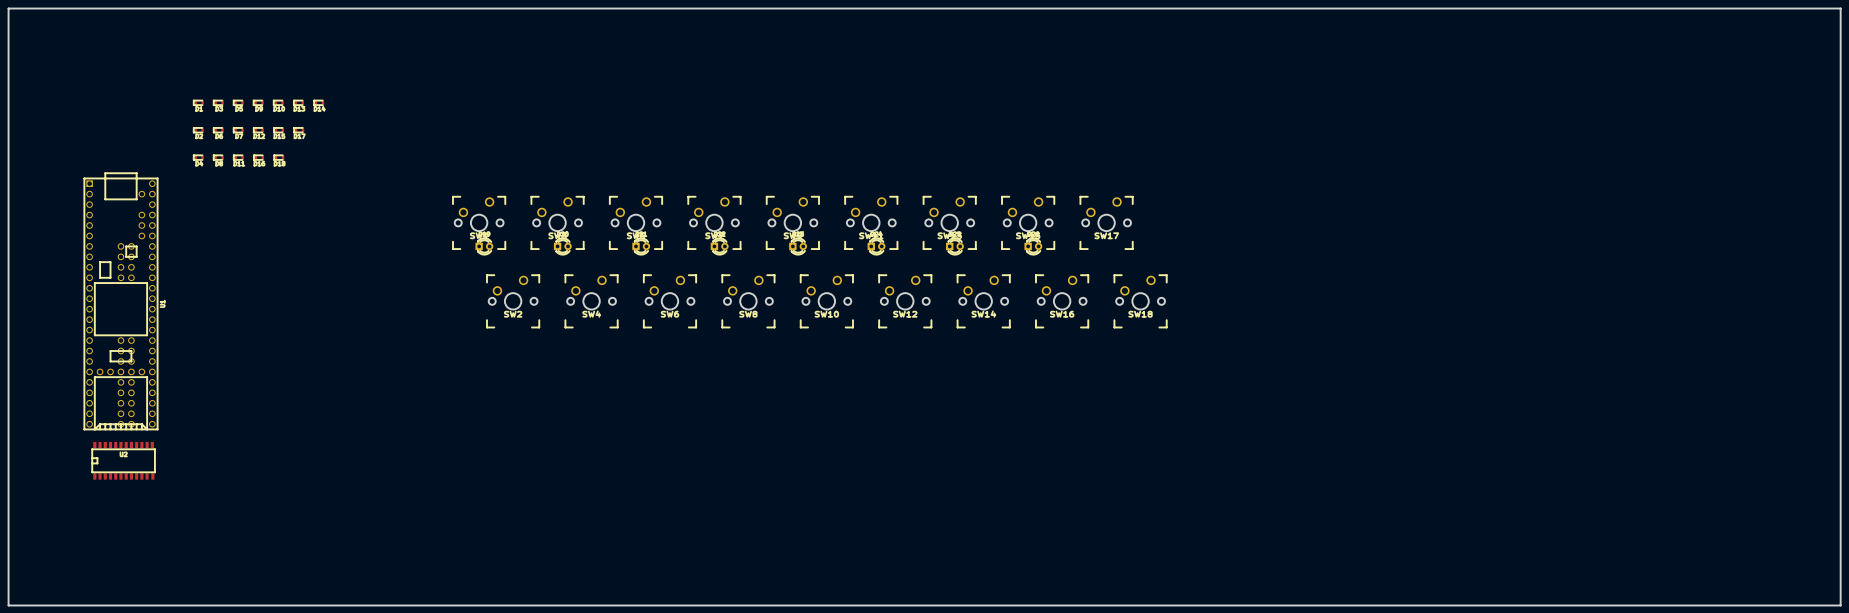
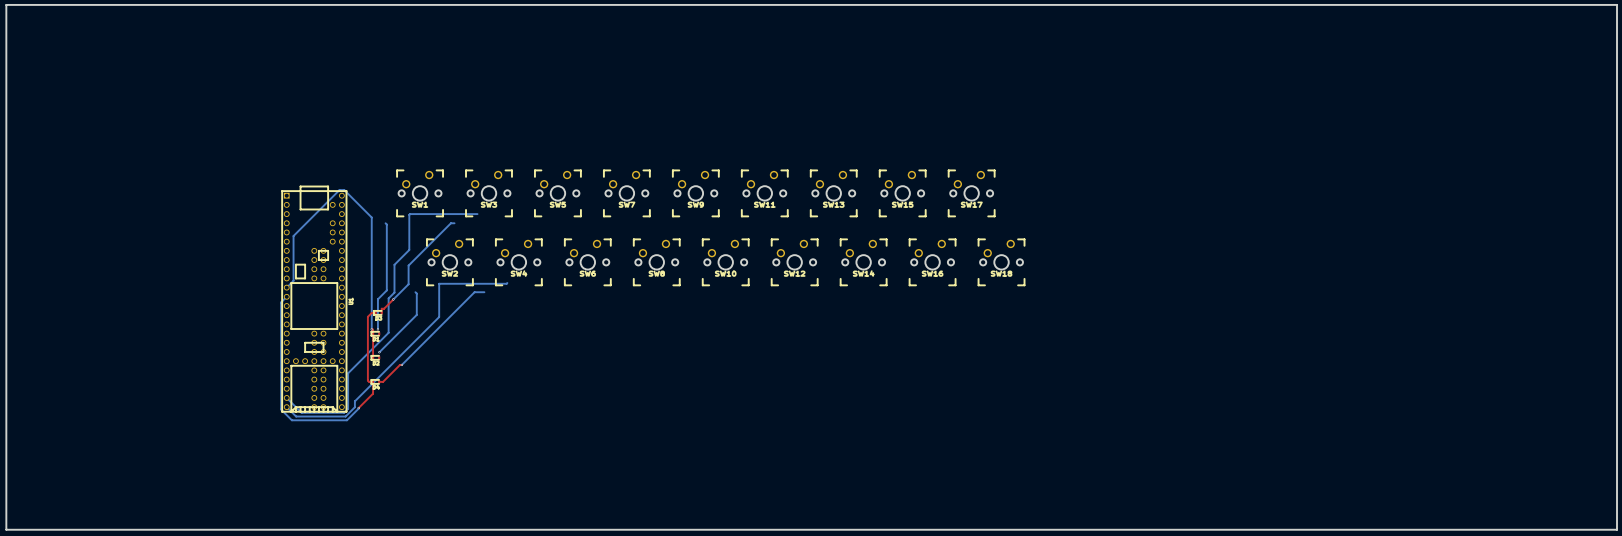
part position: (198, 102) -> (375, 333)
part position: (218, 102) -> (378, 312)
part: (238, 102) -> none
part: (258, 102) -> none
part: (278, 102) -> none
part: (298, 102) -> none
part: (319, 102) -> none
part position: (198, 130) -> (375, 357)
part: (218, 130) -> none
part: (238, 130) -> none
part: (258, 130) -> none
part: (278, 130) -> none
part: (299, 130) -> none
part position: (198, 157) -> (375, 381)
part: (218, 157) -> none
part: (238, 157) -> none
part: (258, 157) -> none
part: (279, 157) -> none
part: (484, 246) -> none
bottom track: none -> (477, 214) (409, 214) (409, 249) (394, 264) (394, 292) (388, 298) (388, 332) (348, 373) (348, 408) (344, 412) (301, 412) (286, 397)
part: (562, 246) -> none
part: (641, 246) -> none
part: (719, 246) -> none
part: (798, 246) -> none
part: (876, 246) -> none
part: (954, 246) -> none
part: (1033, 246) -> none
bottom track: none -> (385, 223) (386, 290) (377, 299) (377, 329)
bottom track: none -> (454, 223) (450, 223) (408, 265) (408, 284) (393, 299)
part position: (120, 301) -> (314, 299)
bottom track: none -> (507, 283) (439, 283) (439, 317) (354, 401) (354, 407) (345, 416) (296, 416) (286, 407)
bottom track: none -> (286, 287) (293, 280) (293, 236) (339, 190) (344, 190) (371, 217) (371, 329)
bottom track: none -> (415, 292) (416, 314) (379, 352)
bottom track: none -> (484, 292) (474, 292) (401, 364)
bottom track: none -> (286, 296) (281, 302) (281, 409) (291, 420) (346, 420) (358, 408)
top track: none -> (393, 299) (381, 308) (381, 312)
via: none -> (393, 299)
top track: none -> (375, 312) (371, 312) (367, 316) (367, 380) (373, 381) (373, 393) (358, 408)
top track: none -> (371, 329) (373, 357)
via: none -> (371, 329)
via: none -> (377, 329)
via: none -> (379, 352)
top track: none -> (401, 364) (383, 381) (379, 381)
via: none -> (401, 364)
part: (123, 460) -> none
via: none -> (358, 408)

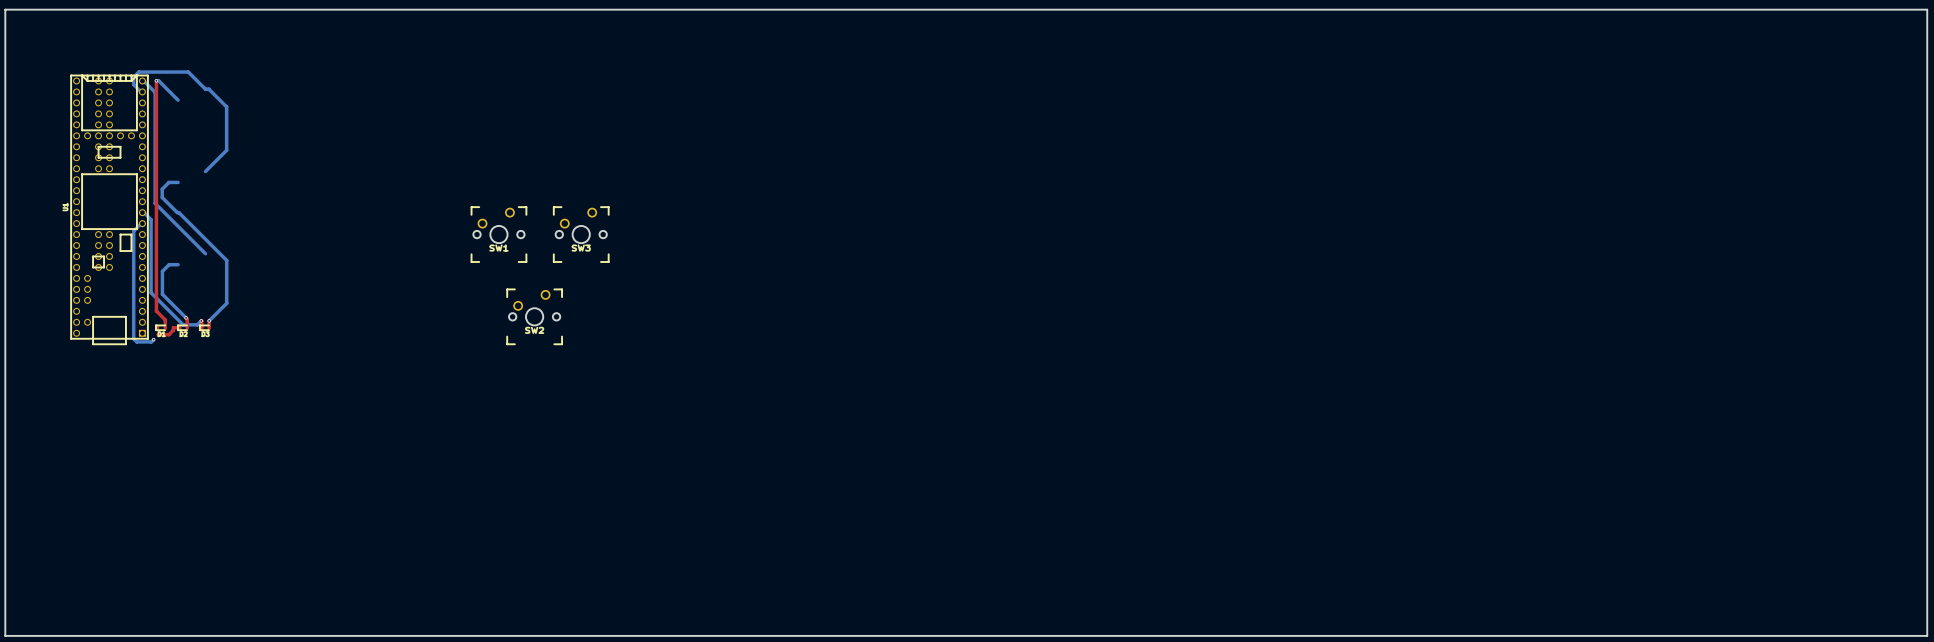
bottom track: none -> (142, 80) (155, 92) (155, 203) (205, 253)
top track: none -> (156, 80) (156, 311) (165, 319) (165, 327)
bottom track: none -> (156, 80) (158, 80) (178, 100)
via: none -> (156, 80)
bottom track: none -> (142, 91) (133, 84) (133, 77) (138, 72) (188, 72) (226, 106) (226, 150) (205, 171)
bottom track: none -> (178, 182) (168, 182) (162, 189) (162, 197) (226, 260) (226, 303) (209, 320)
bottom track: none -> (142, 212) (151, 219) (151, 292) (183, 324) (197, 324) (201, 320)
bottom track: none -> (142, 223) (133, 231) (133, 338) (136, 341) (151, 341) (153, 339)
part: (557, 193) -> none
part: (626, 193) -> none
part: (695, 193) -> none
part: (764, 193) -> none
part: (833, 193) -> none
part: (902, 193) -> none
part: (971, 193) -> none
bottom track: (477, 214) (409, 214) (409, 249) (394, 264) (394, 292) (388, 298) (388, 332) (348, 373) (348, 408) (344, 412) (301, 412) (286, 397) -> none
bottom track: none -> (178, 264) (169, 264) (162, 271) (162, 294) (186, 317)
bottom track: (385, 223) (386, 290) (377, 299) (377, 329) -> none
bottom track: (454, 223) (450, 223) (408, 265) (408, 284) (393, 299) -> none
part: (518, 262) -> none
part: (587, 262) -> none
part: (656, 262) -> none
part: (725, 262) -> none
part: (794, 262) -> none
part: (863, 262) -> none
part: (932, 262) -> none
part: (1001, 262) -> none
top track: none -> (186, 317) (187, 327)
via: none -> (186, 317)
top track: none -> (201, 320) (201, 327)
via: none -> (201, 320)
top track: none -> (209, 320) (209, 327)
via: none -> (209, 320)
top track: none -> (179, 327) (173, 327) (168, 334) (157, 334)
via: none -> (153, 339)
bottom track: (507, 283) (439, 283) (439, 317) (354, 401) (354, 407) (345, 416) (296, 416) (286, 407) -> none
bottom track: (286, 287) (293, 280) (293, 236) (339, 190) (344, 190) (371, 217) (371, 329) -> none
bottom track: (415, 292) (416, 314) (379, 352) -> none
bottom track: (484, 292) (474, 292) (401, 364) -> none
bottom track: (286, 296) (281, 302) (281, 409) (291, 420) (346, 420) (358, 408) -> none
part rotation: 0° (314, 299) -> 180° (109, 209)
part position: (314, 299) -> (109, 209)
top track: (393, 299) (381, 308) (381, 312) -> none
via: (393, 299) -> none
top track: (375, 312) (371, 312) (367, 316) (367, 380) (373, 381) (373, 393) (358, 408) -> none
part position: (378, 312) -> (205, 327)
top track: (371, 329) (373, 357) -> none
via: (371, 329) -> none
via: (377, 329) -> none
part position: (375, 333) -> (161, 327)
via: (379, 352) -> none
part position: (375, 357) -> (183, 327)
top track: (401, 364) (383, 381) (379, 381) -> none
via: (401, 364) -> none
part: (375, 381) -> none
via: (358, 408) -> none

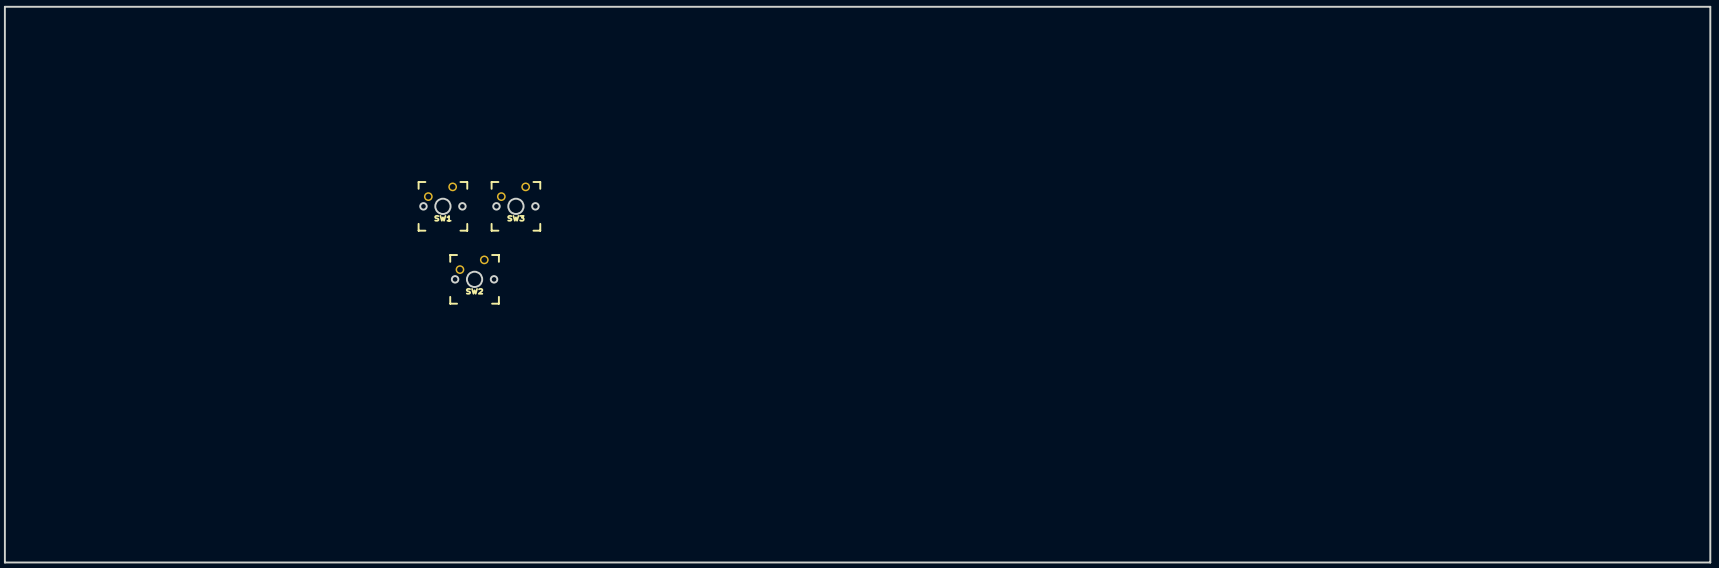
bottom track: (142, 80) (155, 92) (155, 203) (205, 253) -> none
top track: (156, 80) (156, 311) (165, 319) (165, 327) -> none
bottom track: (156, 80) (158, 80) (178, 100) -> none
via: (156, 80) -> none
bottom track: (142, 91) (133, 84) (133, 77) (138, 72) (188, 72) (226, 106) (226, 150) (205, 171) -> none
bottom track: (178, 182) (168, 182) (162, 189) (162, 197) (226, 260) (226, 303) (209, 320) -> none
part: (109, 209) -> none
bottom track: (142, 212) (151, 219) (151, 292) (183, 324) (197, 324) (201, 320) -> none
bottom track: (142, 223) (133, 231) (133, 338) (136, 341) (151, 341) (153, 339) -> none
bottom track: (178, 264) (169, 264) (162, 271) (162, 294) (186, 317) -> none
top track: (186, 317) (187, 327) -> none
via: (186, 317) -> none
top track: (201, 320) (201, 327) -> none
via: (201, 320) -> none
top track: (209, 320) (209, 327) -> none
via: (209, 320) -> none
part: (161, 327) -> none
top track: (179, 327) (173, 327) (168, 334) (157, 334) -> none
part: (183, 327) -> none
part: (205, 327) -> none
via: (153, 339) -> none

